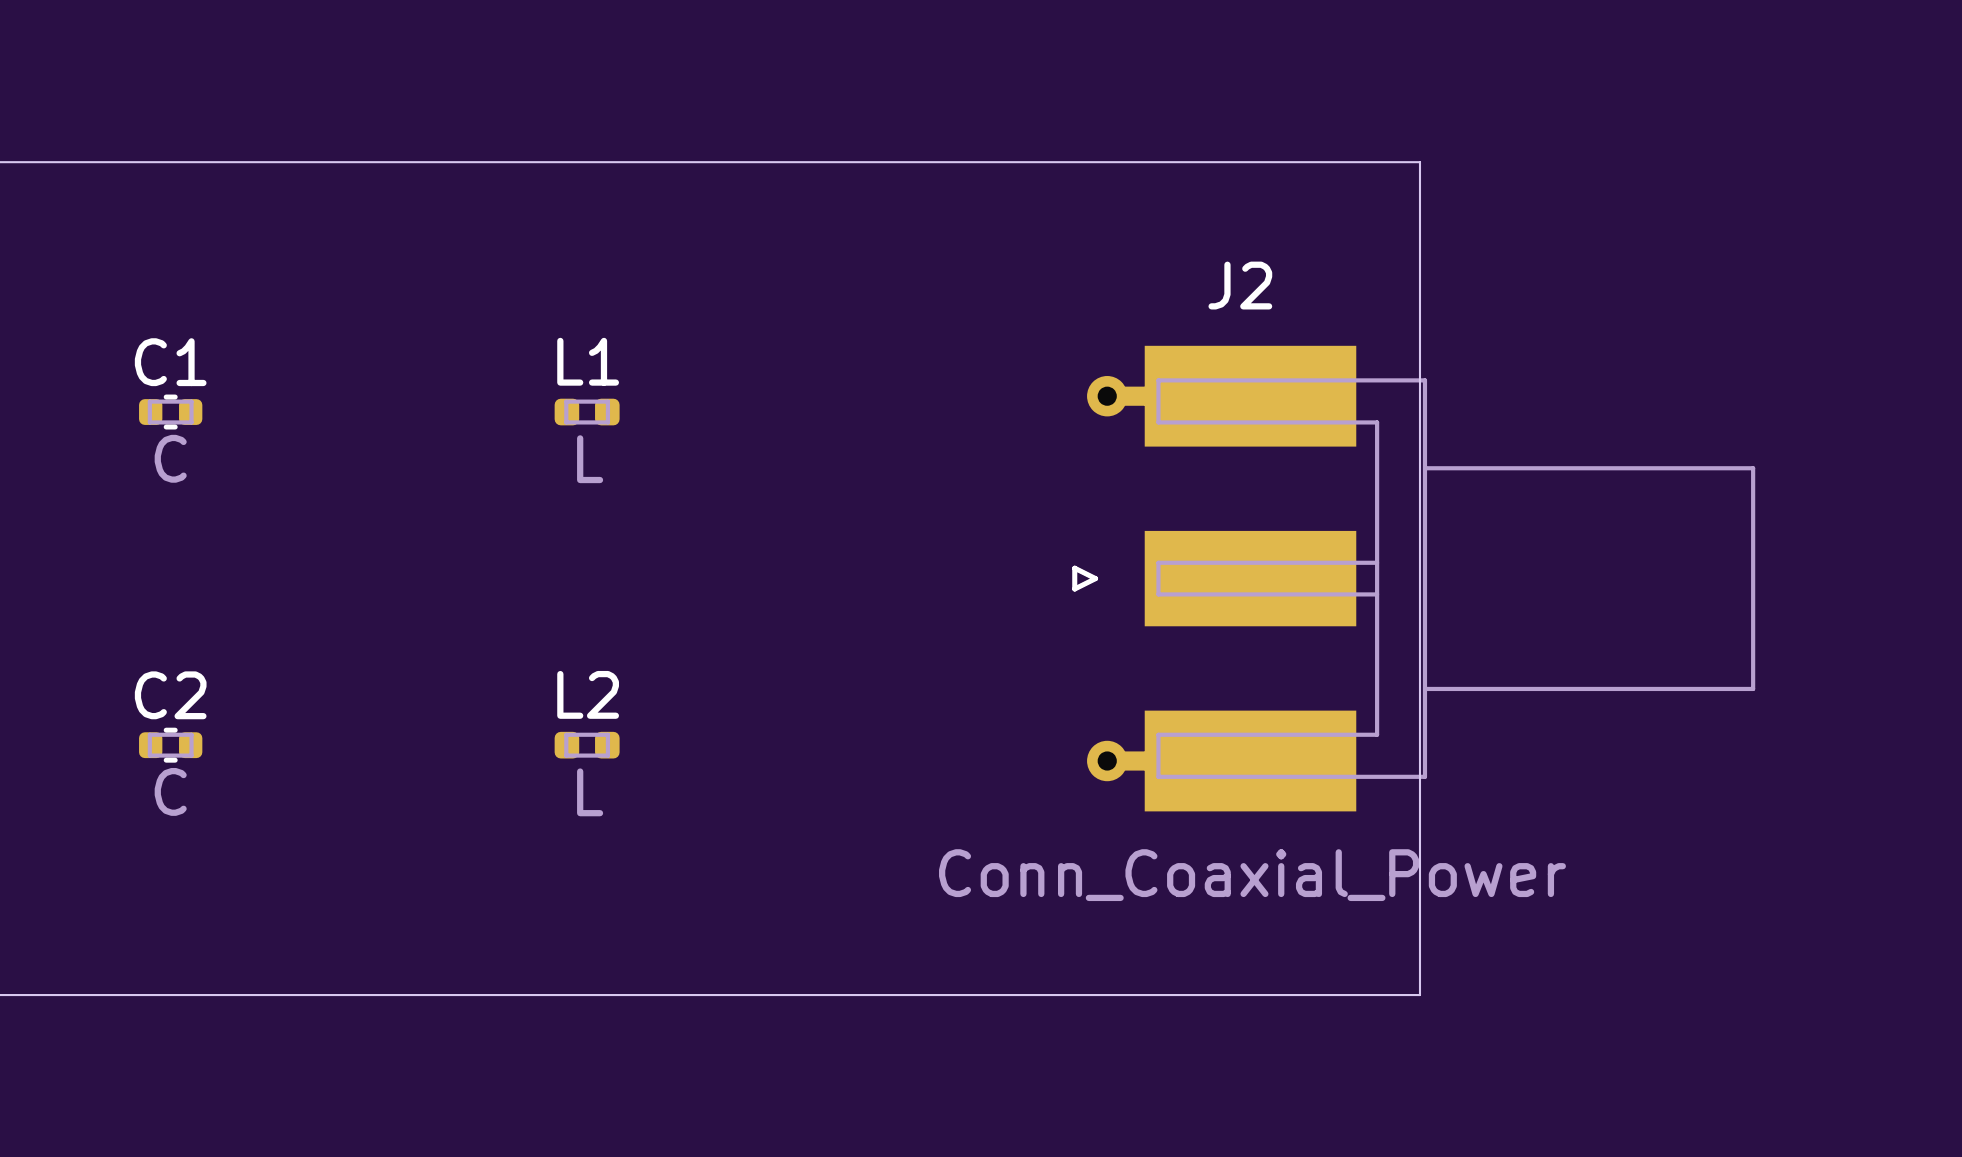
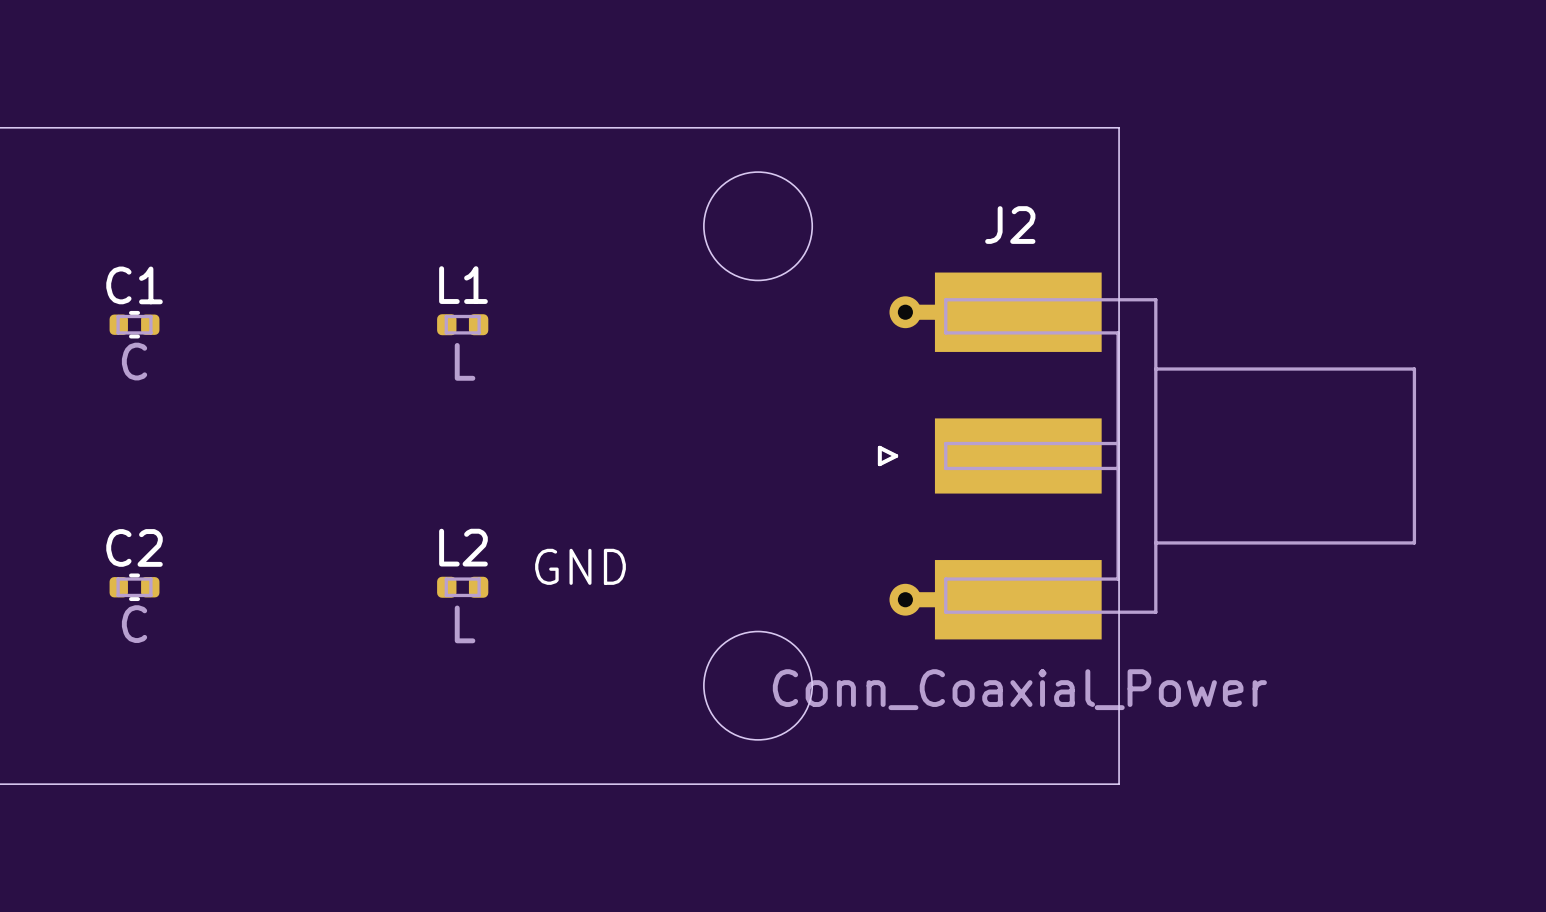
round board edge: none -> [703, 171, 814, 282]
J2 position: (1413, 578) -> (1146, 455)
text: none -> GND (580, 566)
round board edge: none -> [703, 630, 814, 741]

